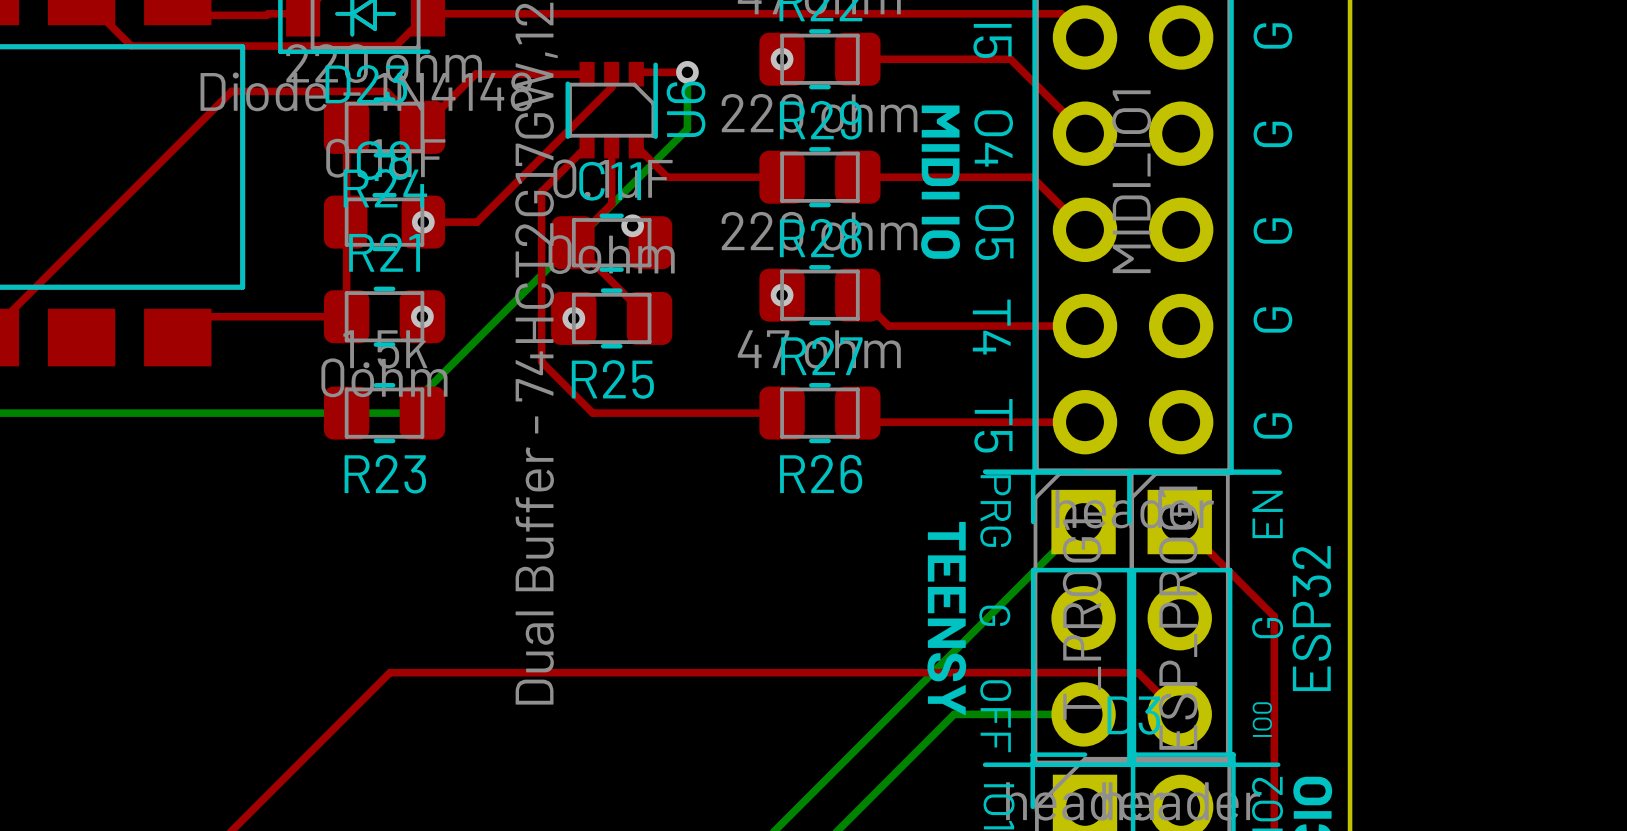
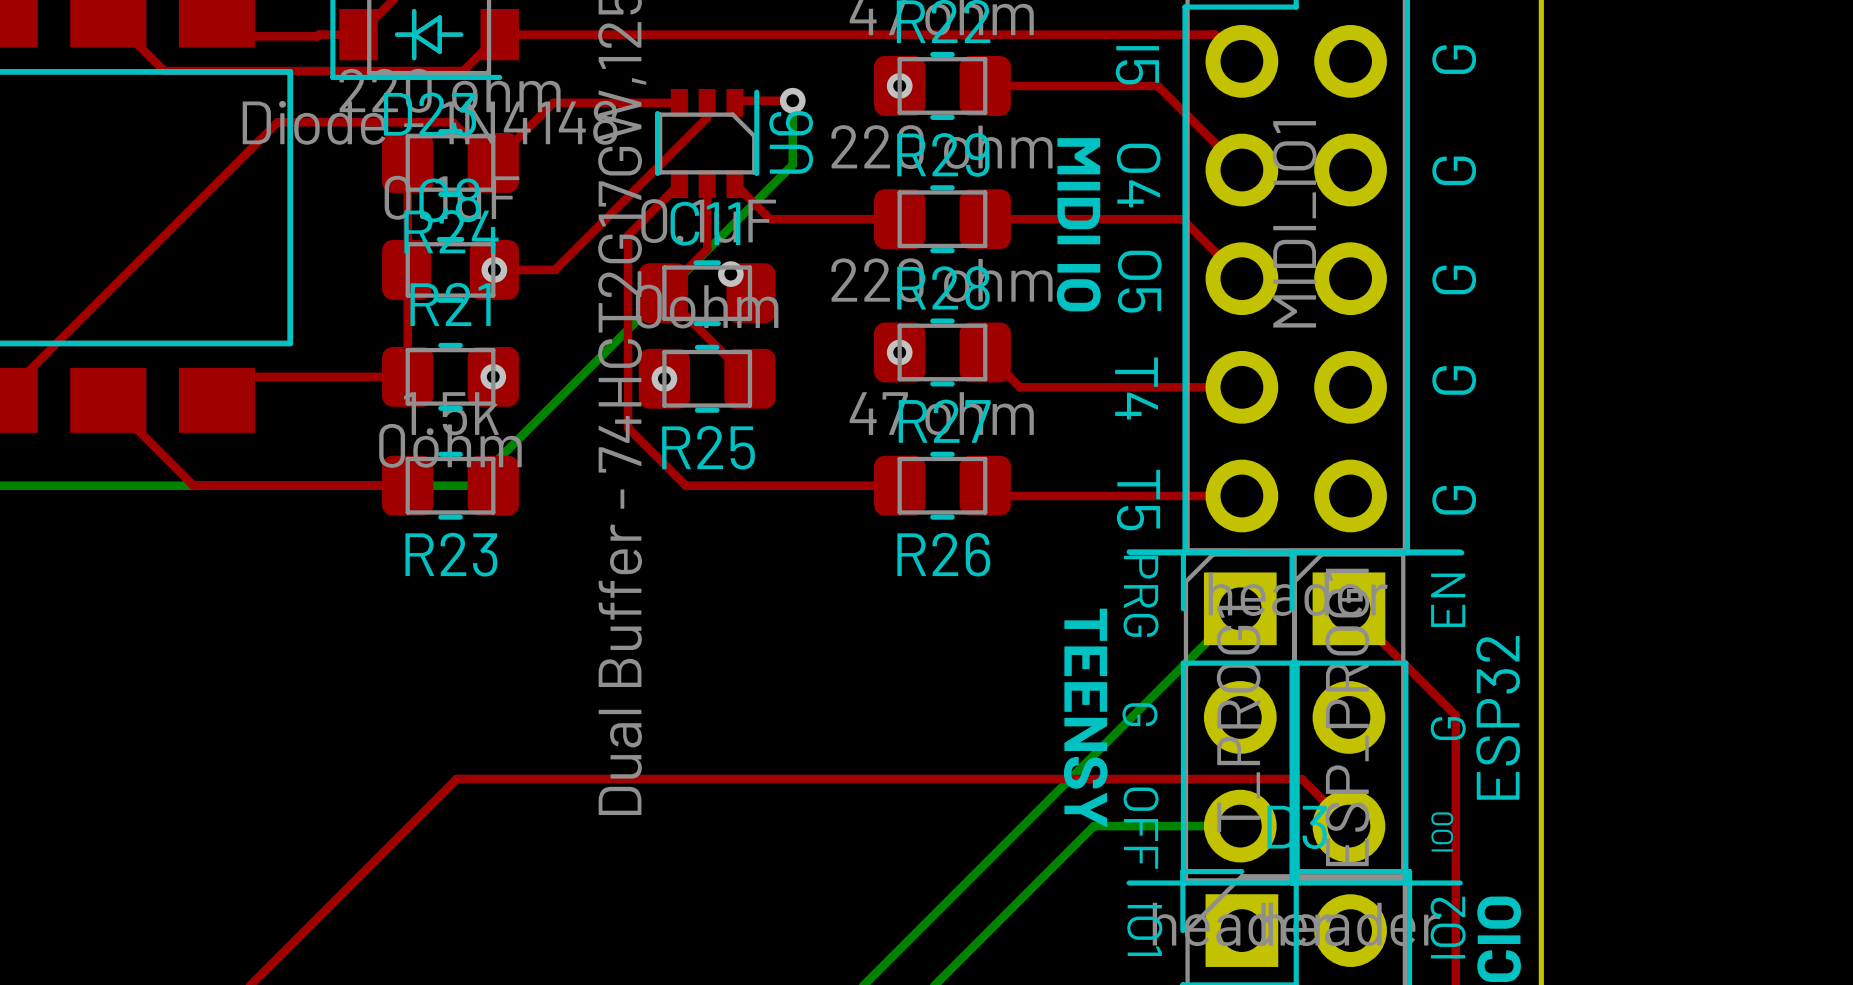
top track: none -> (108, 400) (193, 485) (407, 485)

